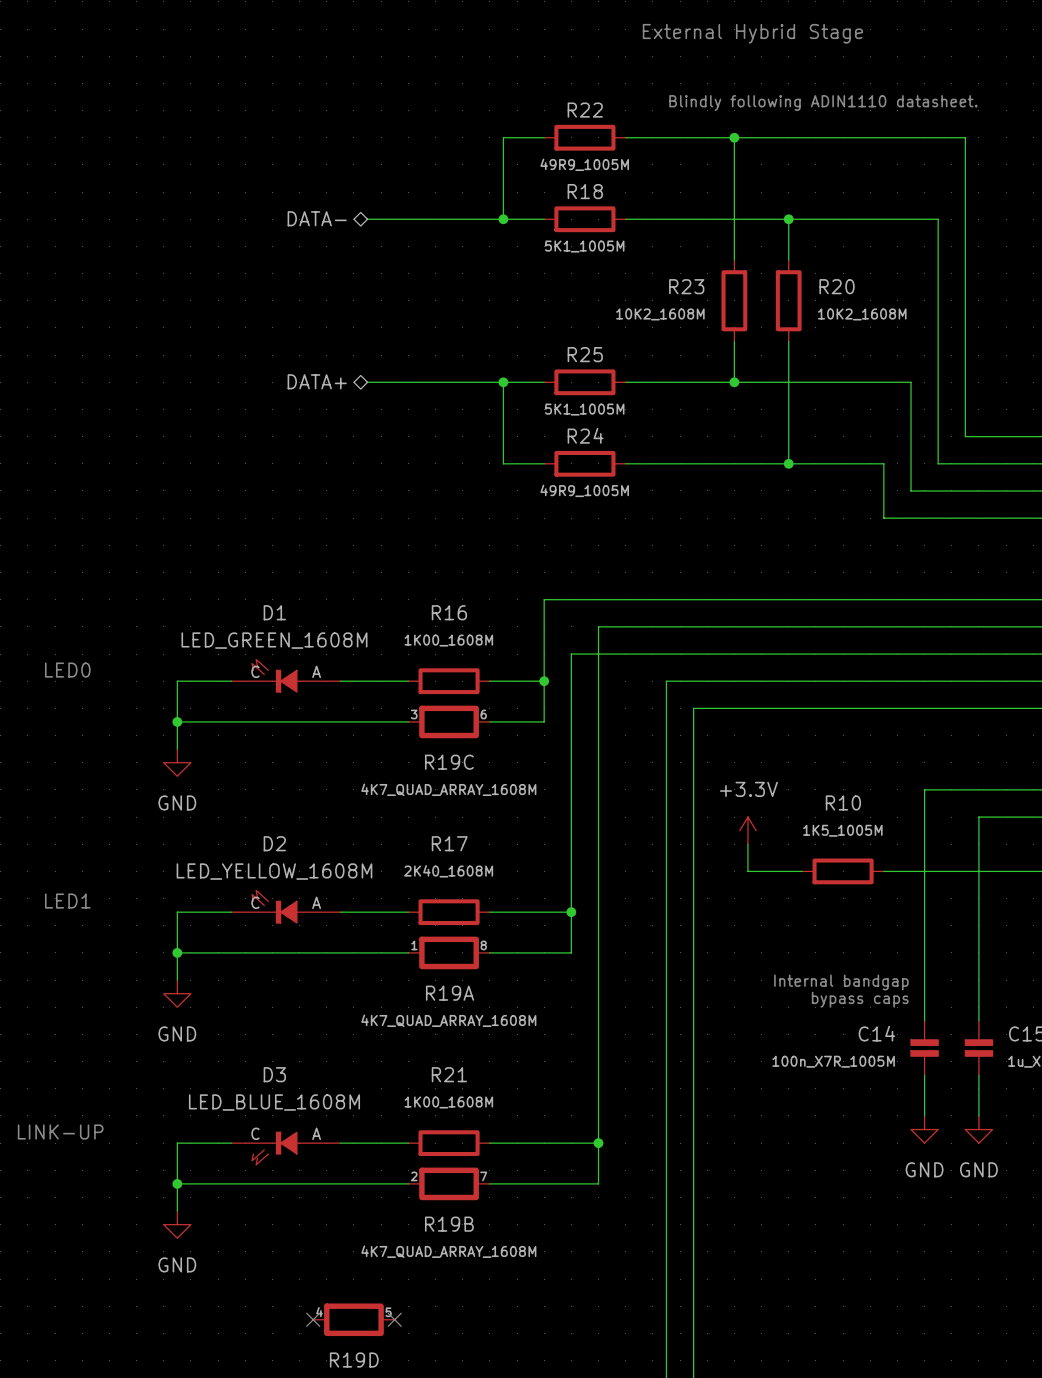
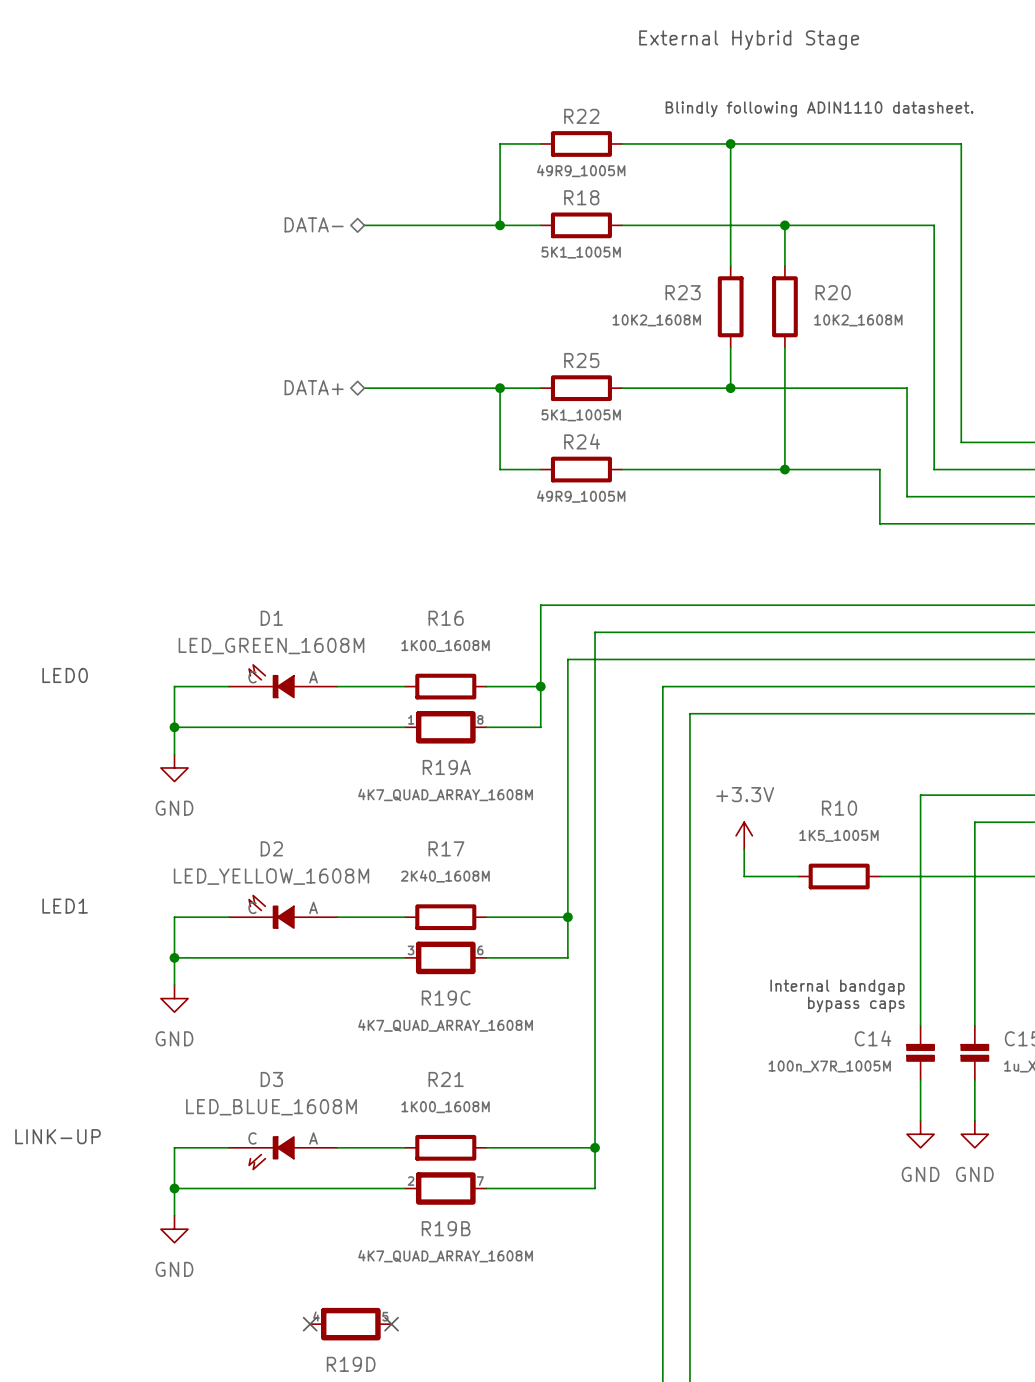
R19C position: (449, 721) -> (445, 957)
R19A position: (449, 952) -> (445, 727)

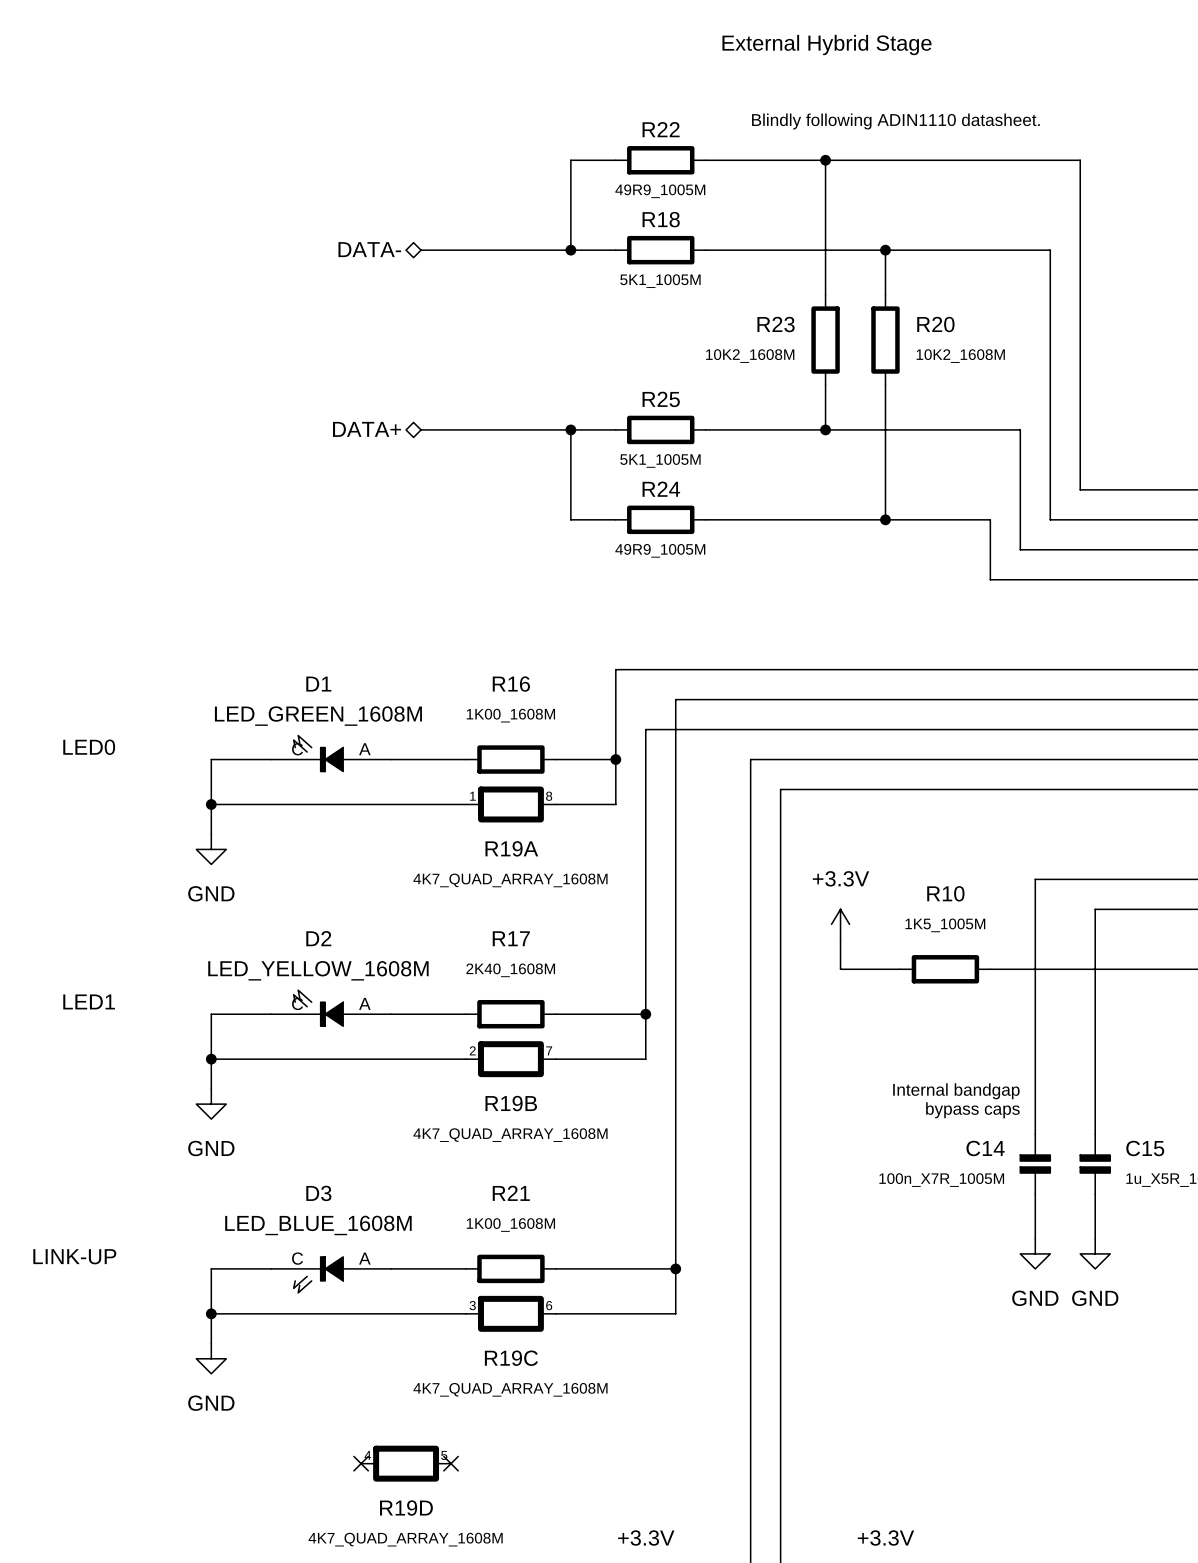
R19C position: (445, 957) -> (510, 1313)
R19B position: (445, 1188) -> (510, 1059)

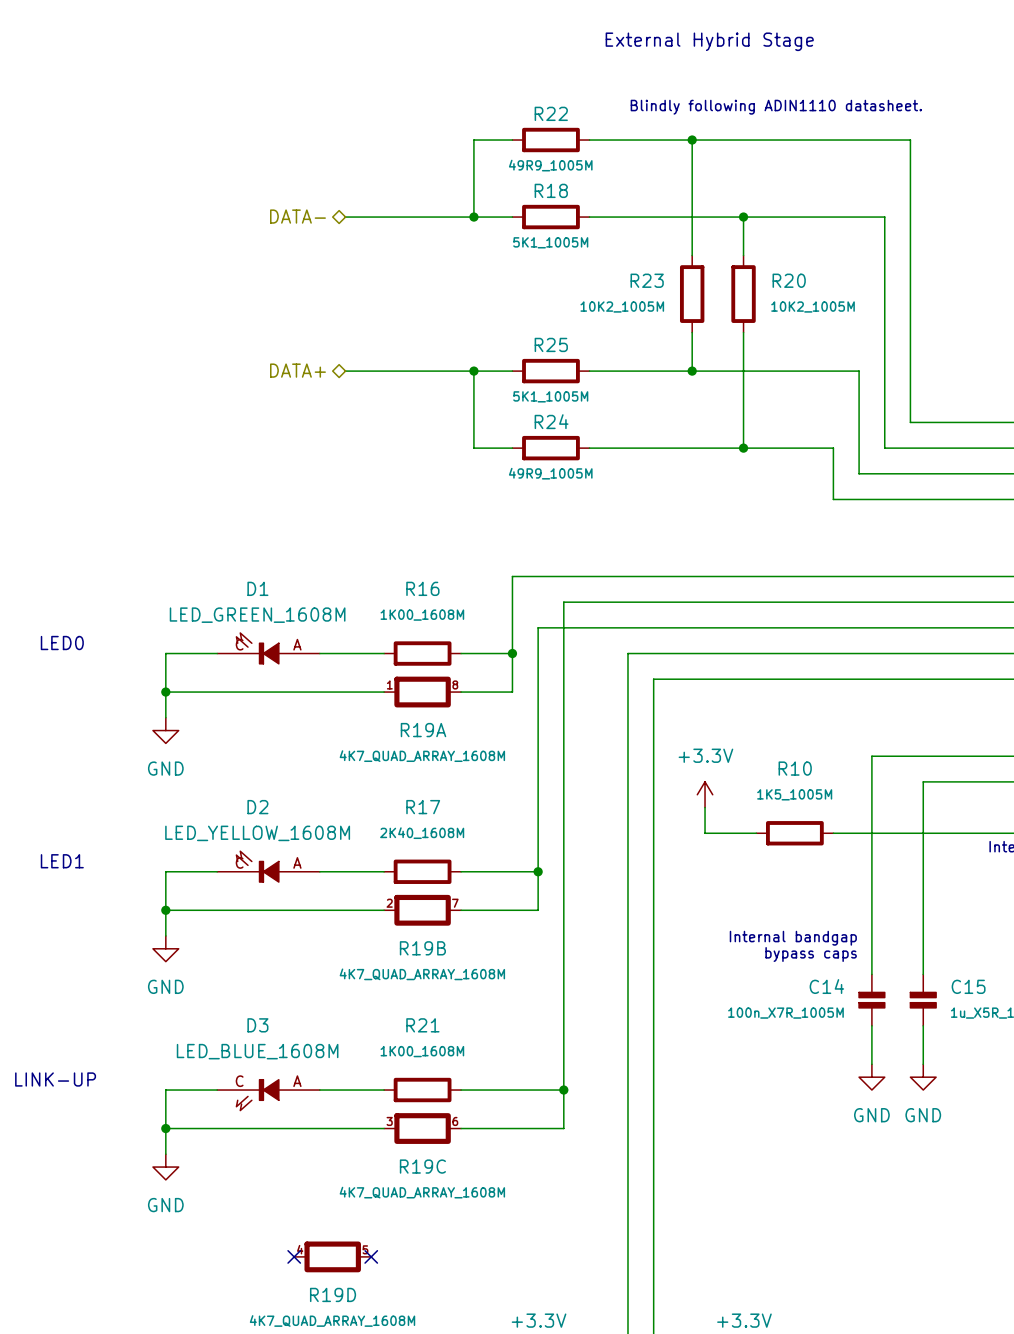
R23 value: 10K2_1608M (750, 356) -> 10K2_1005M (622, 307)
R20 value: 10K2_1608M (960, 356) -> 10K2_1005M (813, 307)

